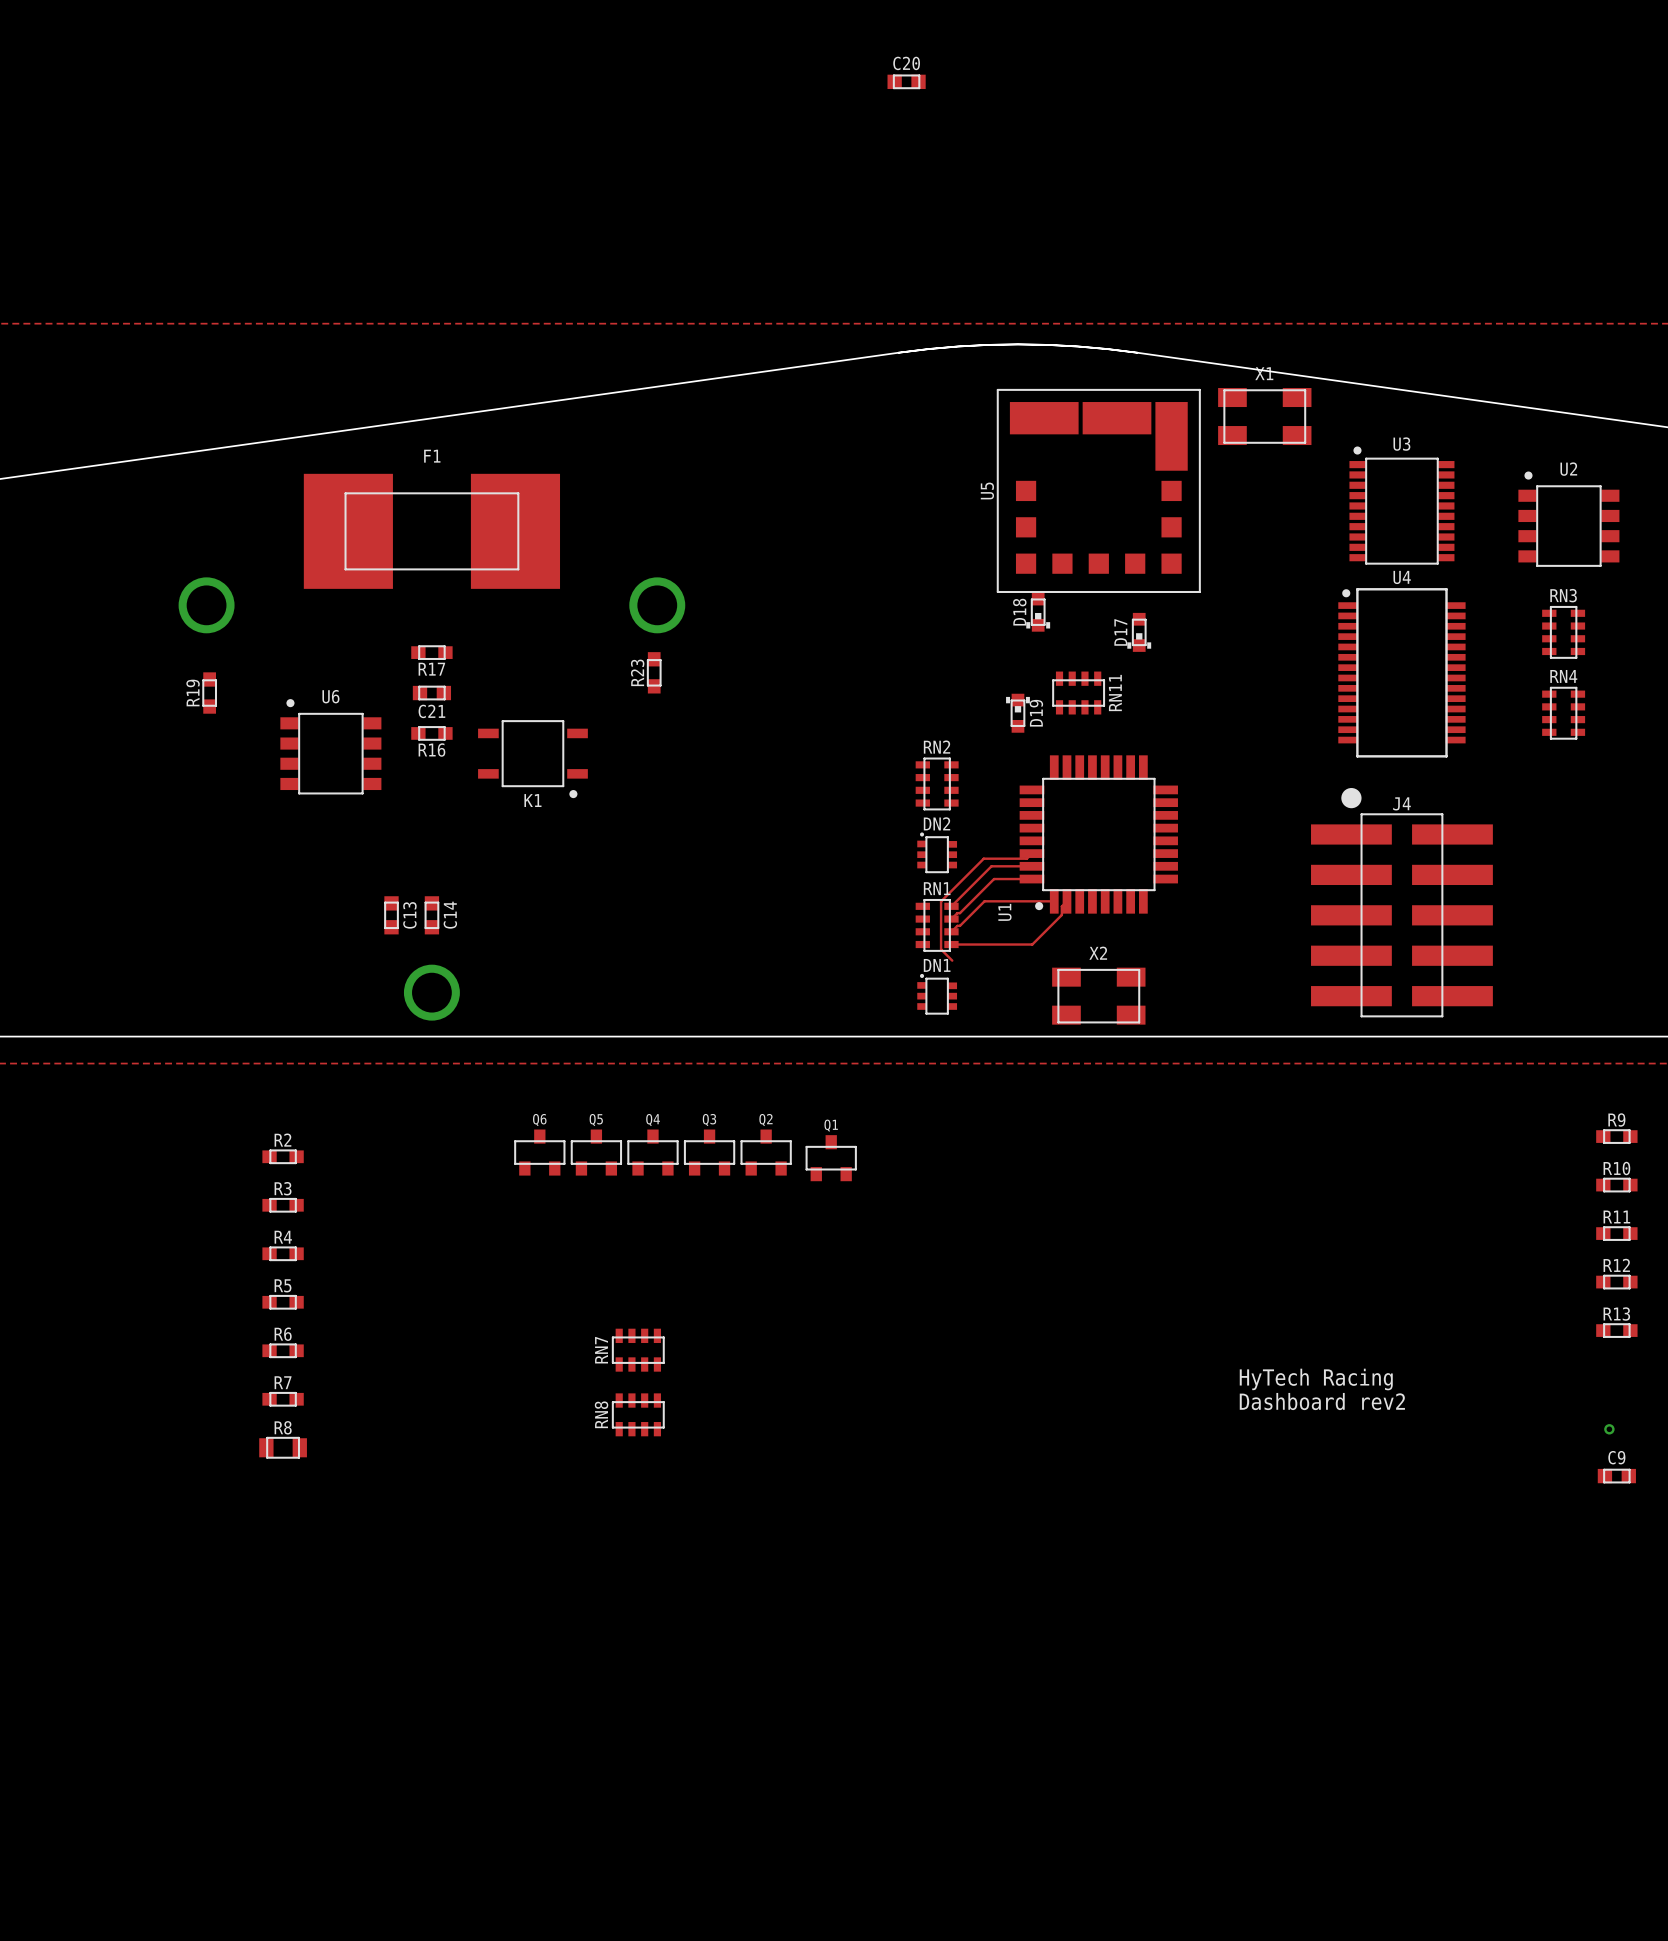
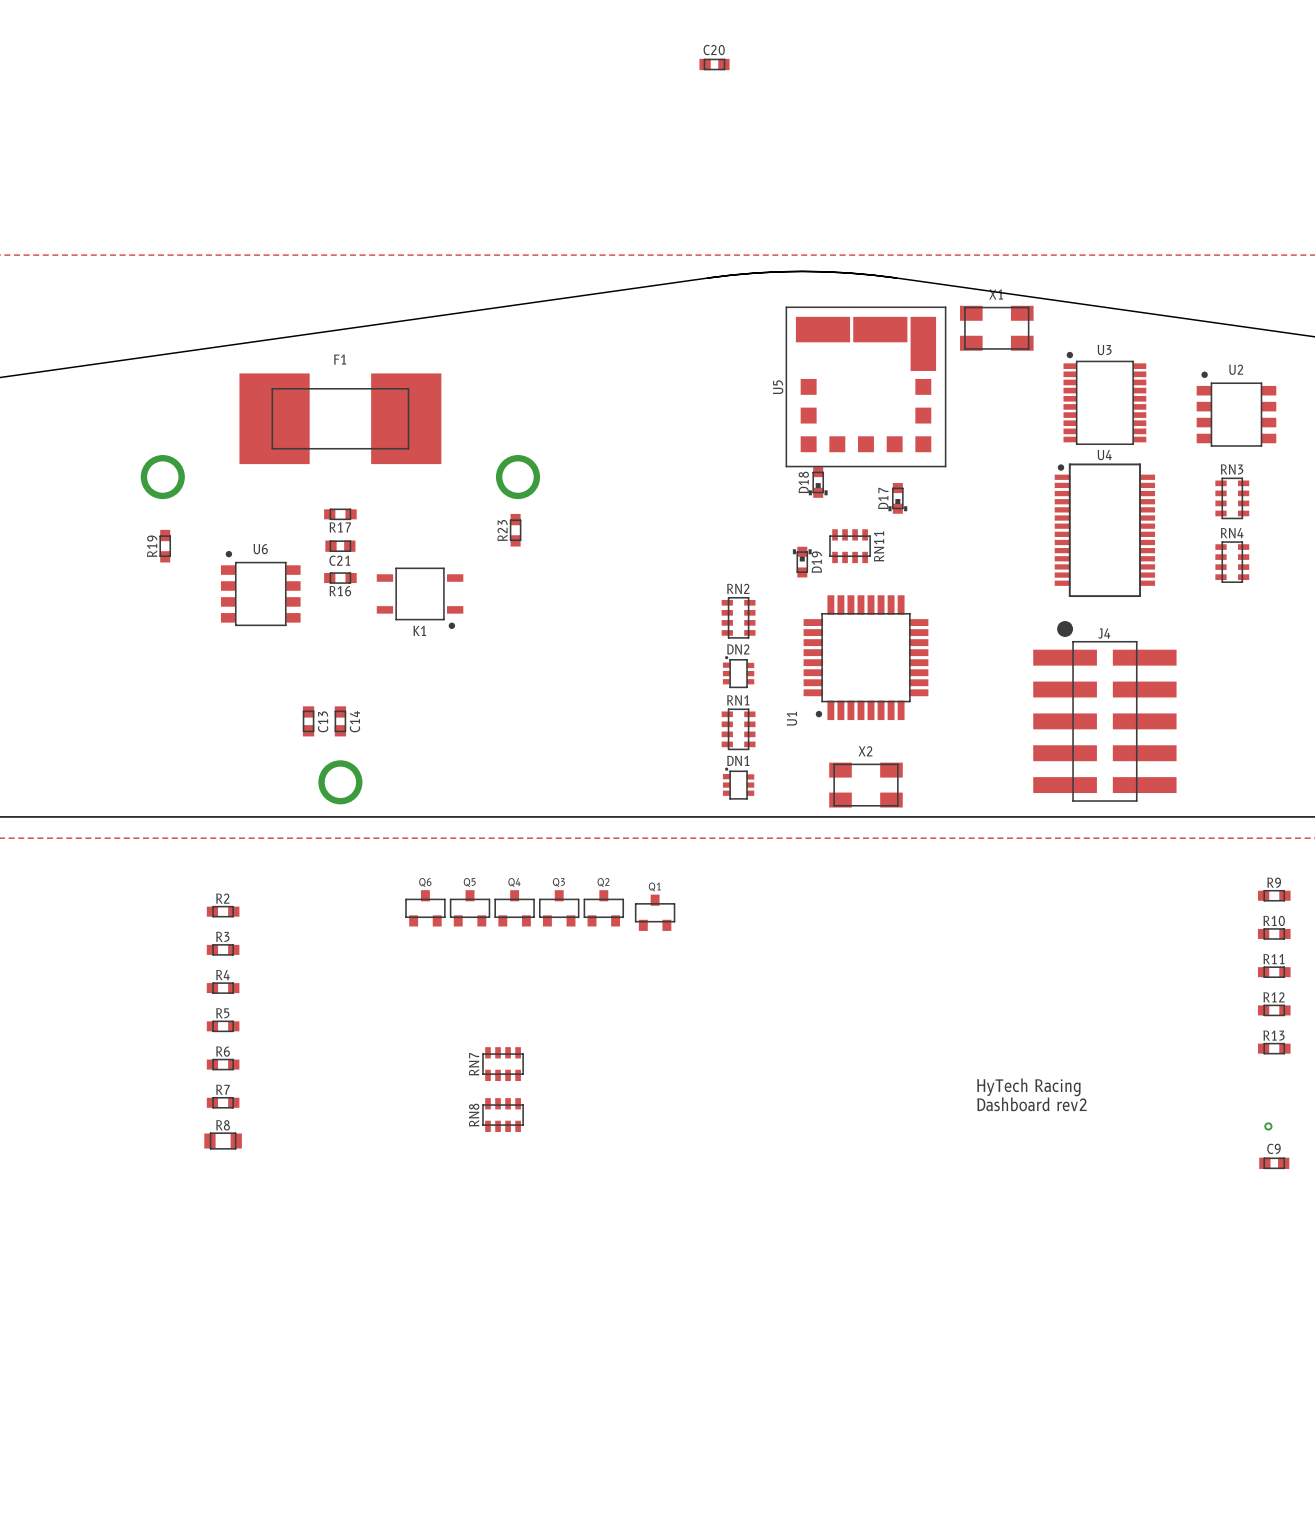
track: (1031, 853) (1026, 858) (983, 858) (941, 901) (941, 949) (952, 960) -> none
track: (1031, 866) (991, 866) (951, 906) -> none
track: (1031, 879) (994, 879) (959, 913) (951, 919) -> none
track: (1054, 901) (984, 901) (951, 931) -> none
track: (1066, 901) (1061, 906) (1061, 914) (1032, 944) (951, 944) -> none

